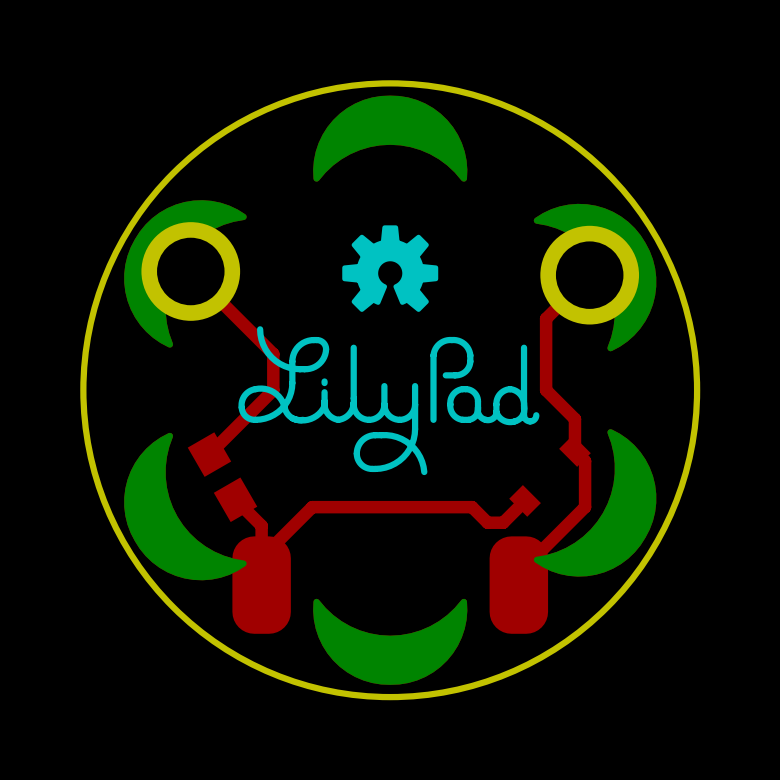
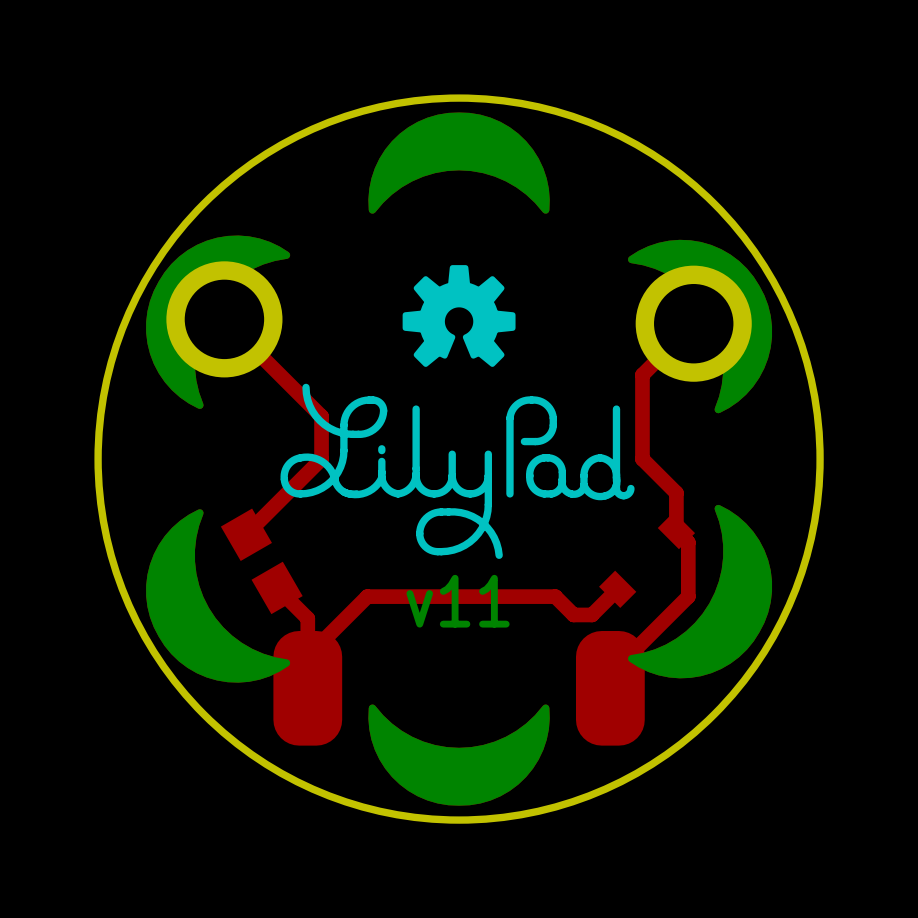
text: none -> v11 (458, 601)

